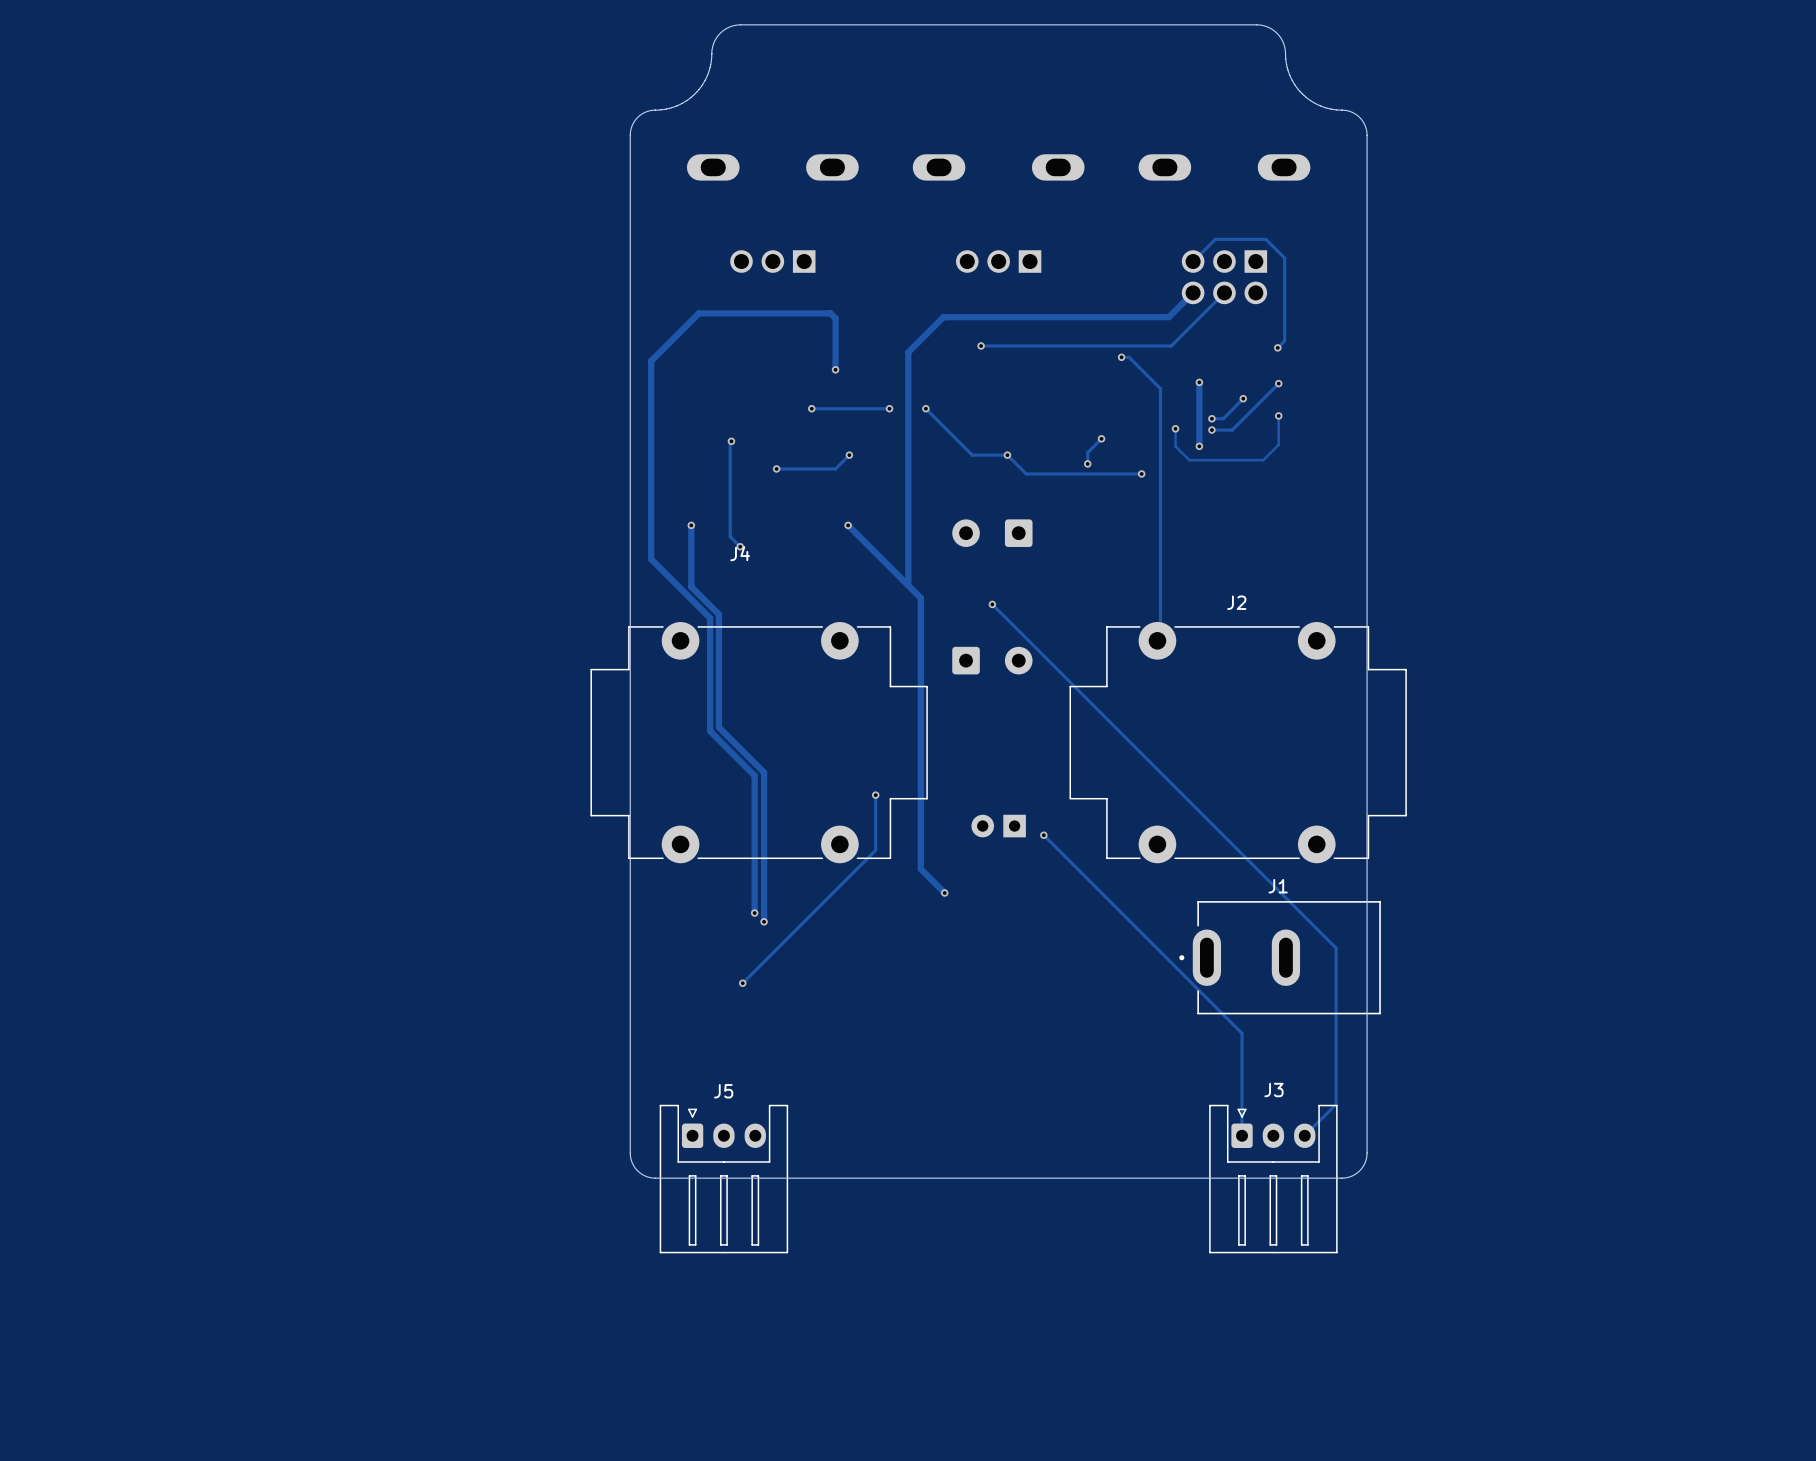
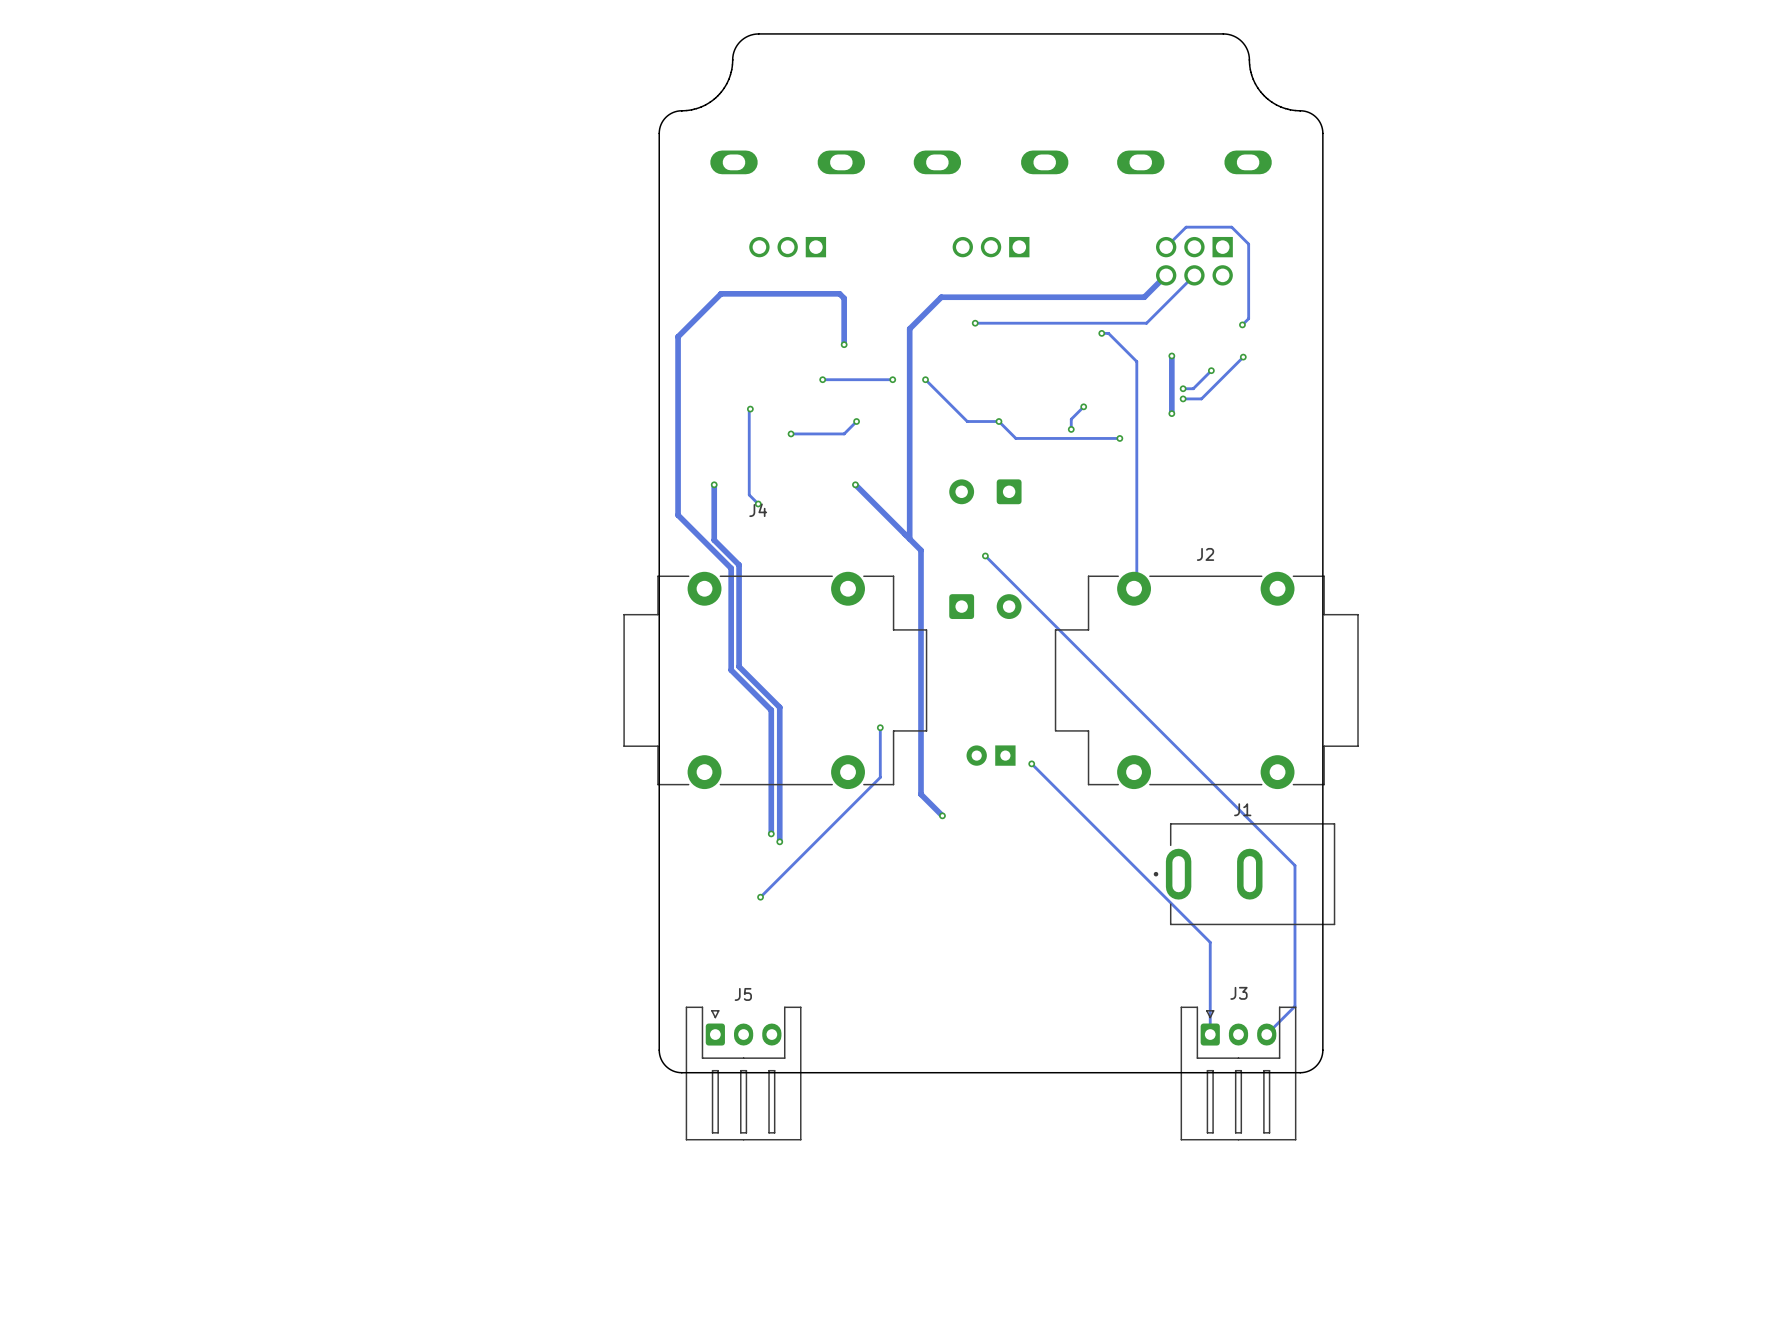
track: (1278, 415) (1278, 444) (1263, 460) (1189, 460) (1175, 446) (1175, 428) -> none
via: (1278, 415) -> none
via: (1175, 428) -> none

